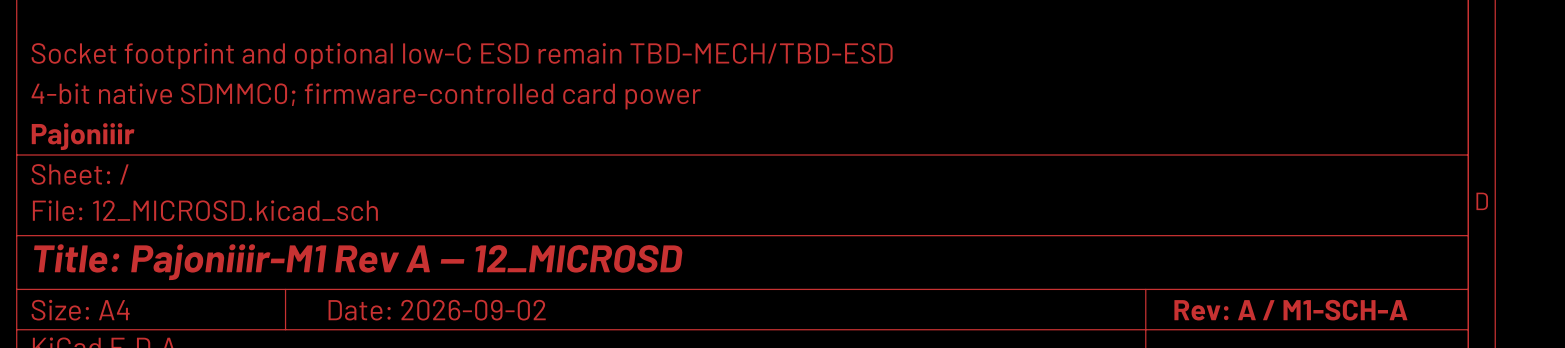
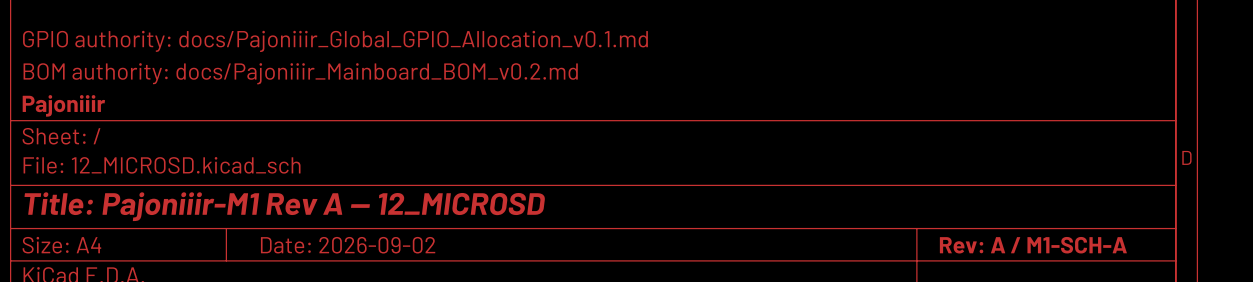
title block: Socket footprint and optional low-C ESD remain TBD-MECH/TBD-ESD (462, 56) -> GPIO authority: docs/Pajoniiir_Global_GPIO_Allocation_v0.1.md (335, 41)
title block: 4-bit native SDMMC0; firmware-controlled card power (366, 96) -> BOM authority: docs/Pajoniiir_Mainboard_BOM_v0.2.md (300, 73)

